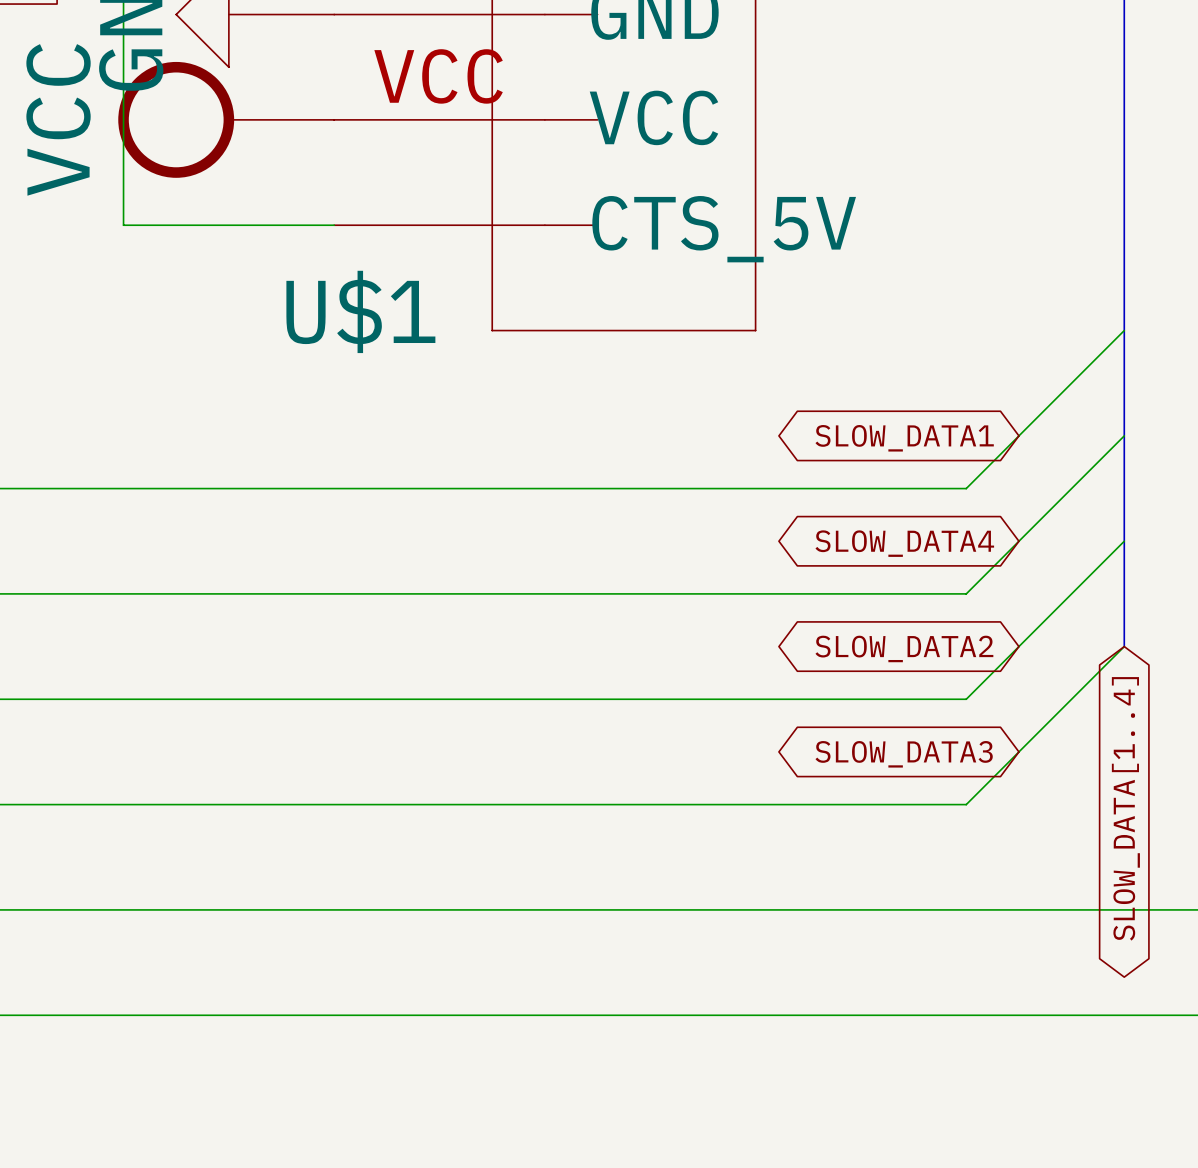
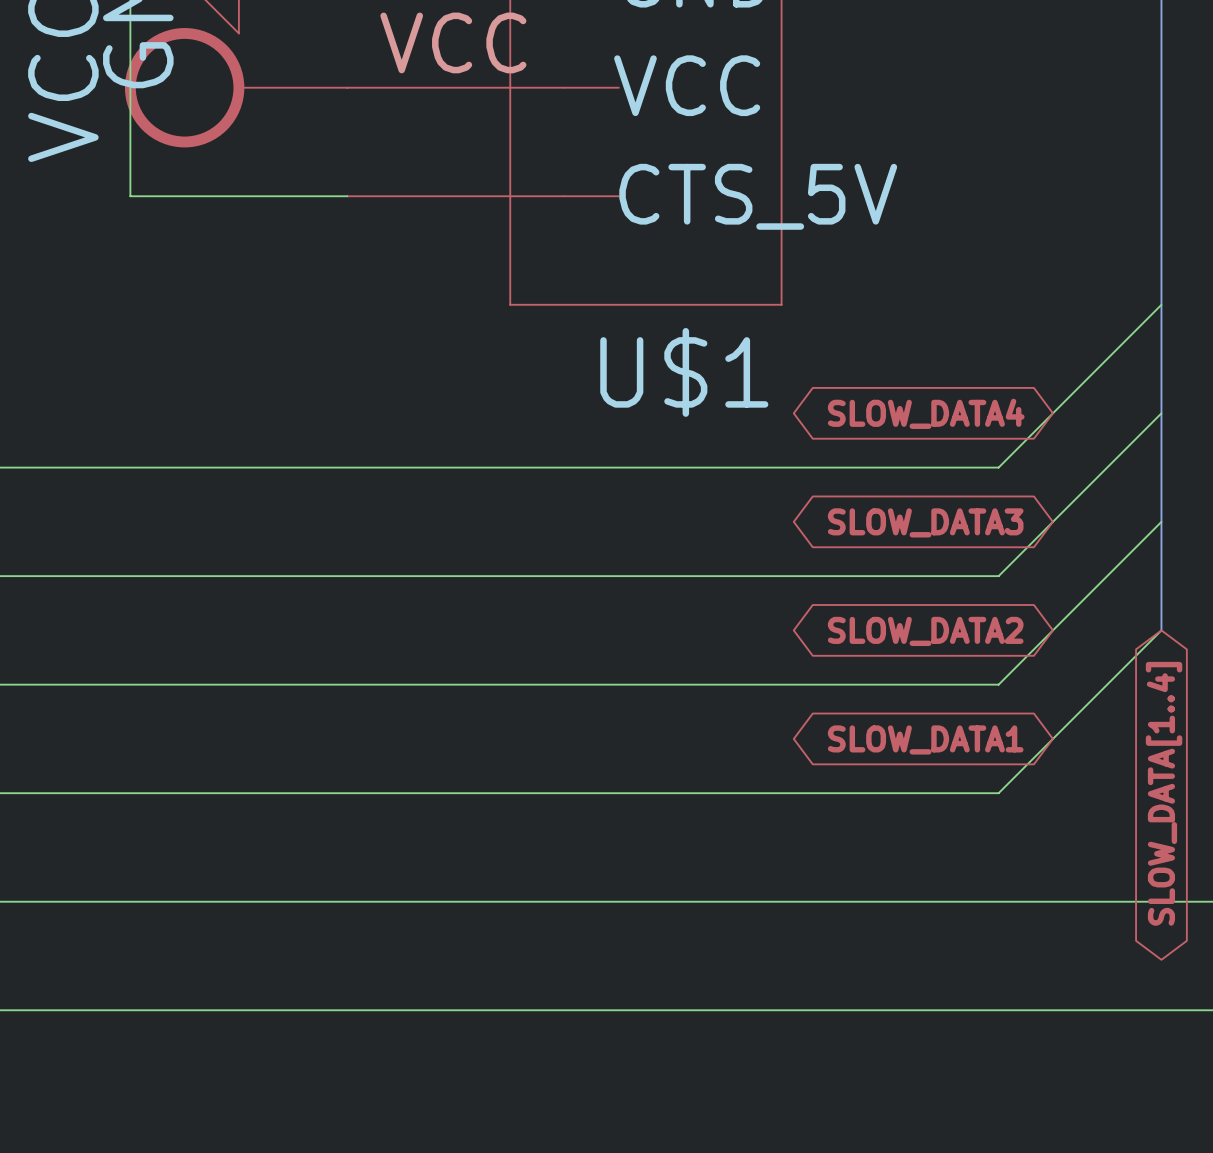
U$1 name position: U$1 (360, 311) -> U$1 (684, 372)
global label: SLOW_DATA1 (904, 438) -> SLOW_DATA4 (926, 413)
global label: SLOW_DATA4 (904, 543) -> SLOW_DATA3 (925, 522)
global label: SLOW_DATA3 (904, 754) -> SLOW_DATA1 (925, 739)

